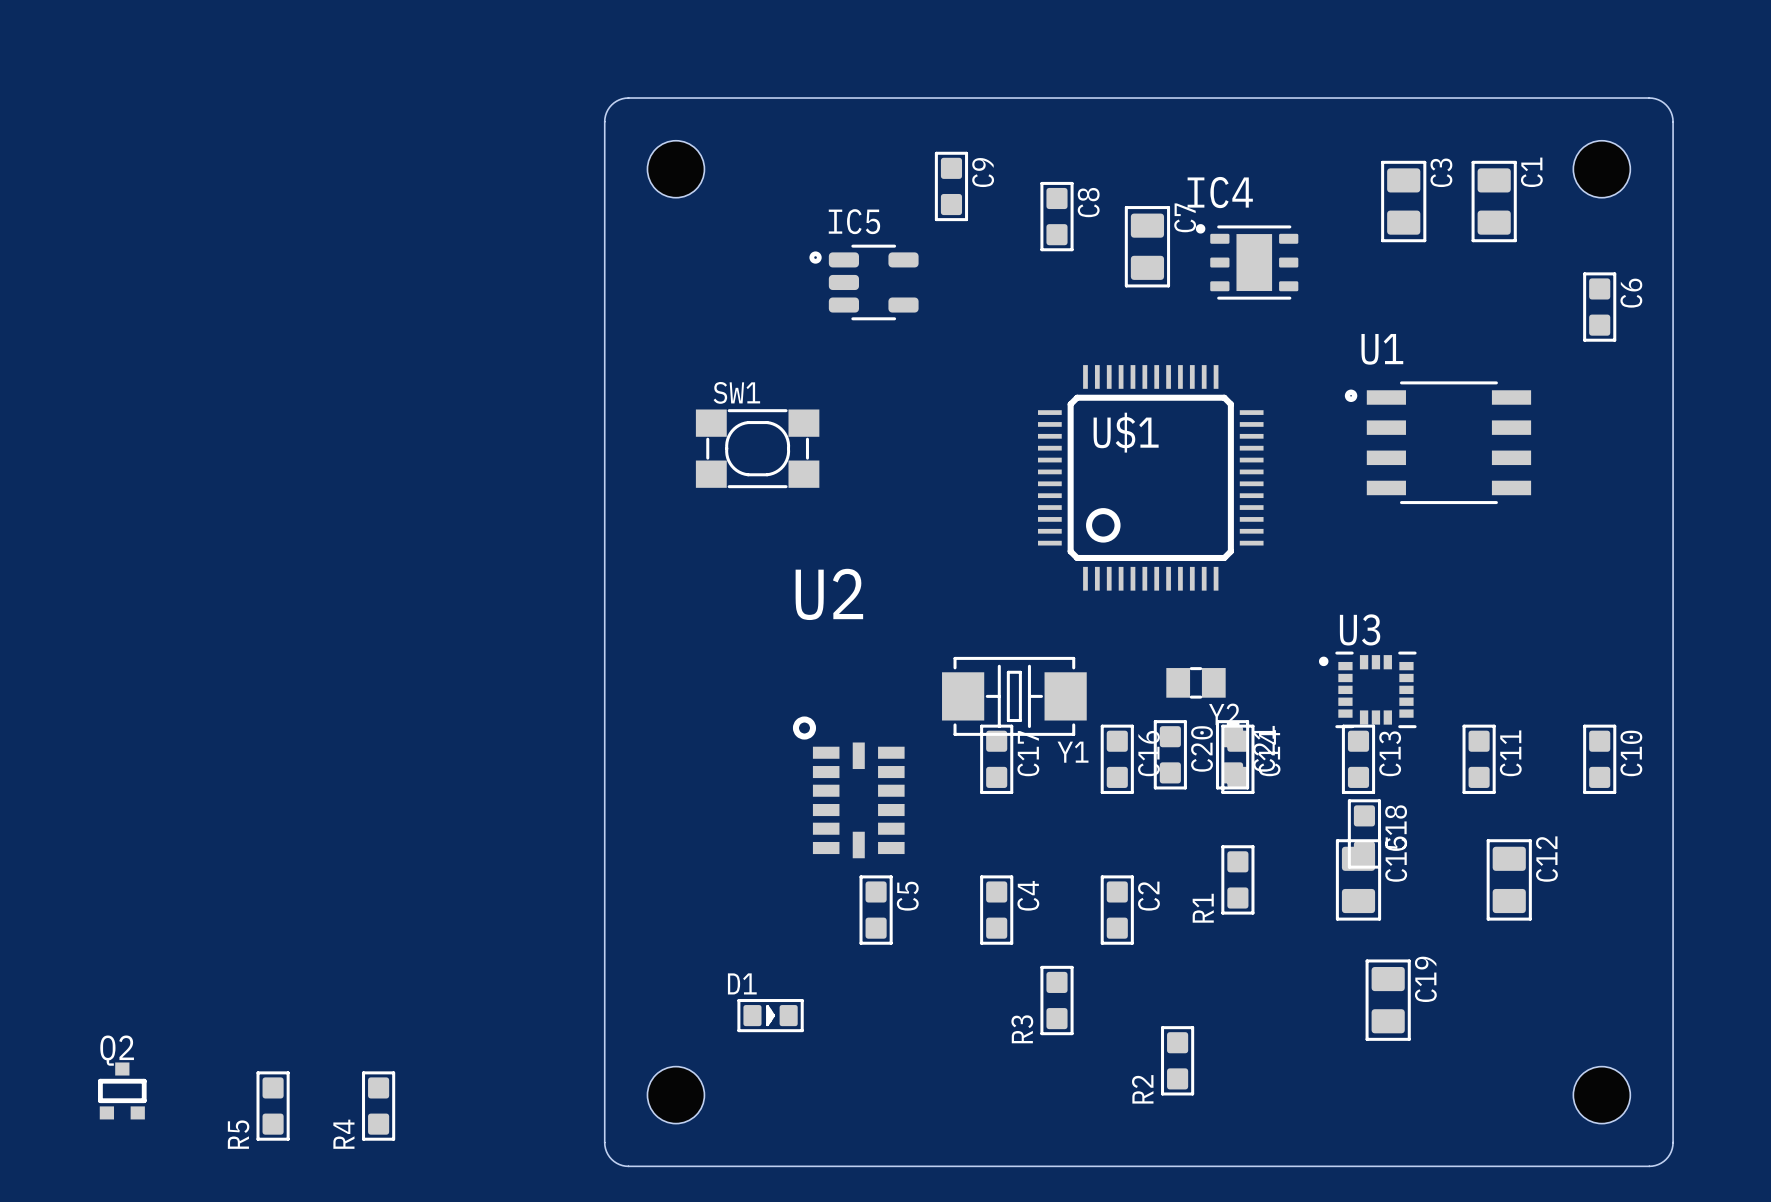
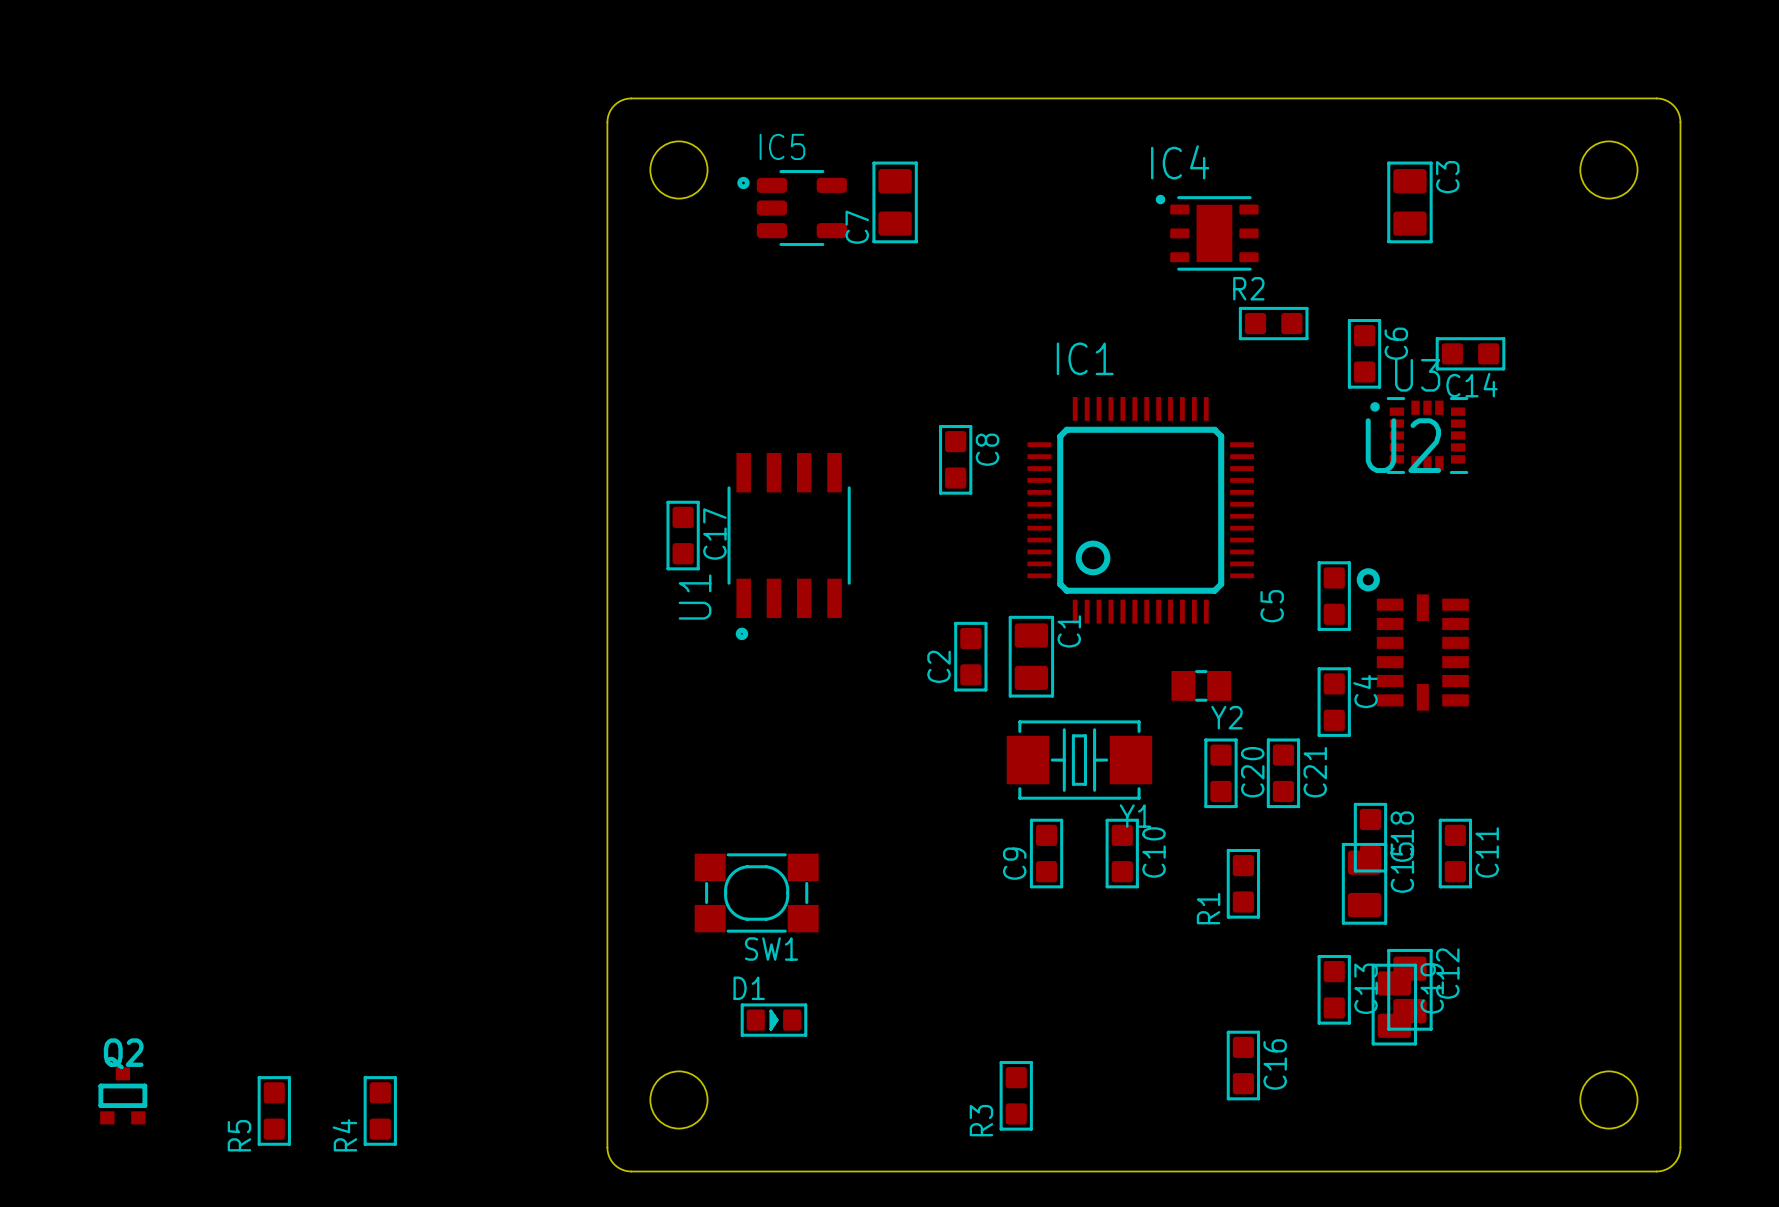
C9 name position: C9 (983, 172) -> C9 (1014, 863)
C9 position: (951, 186) -> (1046, 853)
C1 position: (1494, 201) -> (1031, 656)
C8 position: (1056, 216) -> (955, 459)
C7 name position: C7 (1185, 217) -> C7 (857, 227)
C7 position: (1147, 246) -> (895, 202)
IC4 position: (1247, 261) -> (1207, 232)
IC5 position: (864, 282) -> (792, 208)
C6 position: (1599, 307) -> (1364, 353)
SW1 name position: SW1 (736, 392) -> SW1 (771, 949)
U1 rotation: 0° (1437, 442) -> 90° counterclockwise (789, 546)
U1 position: (1437, 442) -> (789, 546)
SW1 position: (757, 448) -> (756, 892)
U$1: (1150, 477) -> none
IC1: none -> (1140, 510)
U3 position: (1367, 689) -> (1419, 435)
Y1 position: (1014, 696) -> (1079, 760)
C20 position: (1170, 754) -> (1220, 773)
C21 position: (1232, 754) -> (1283, 773)
C17 position: (996, 759) -> (683, 535)
C16 position: (1117, 759) -> (1243, 1065)
C14 rotation: 0° (1237, 759) -> 90° clockwise (1470, 353)
C14 position: (1237, 759) -> (1470, 353)
C13 position: (1358, 759) -> (1334, 989)
C11 position: (1479, 759) -> (1455, 853)
C10 position: (1599, 759) -> (1122, 853)
U2 position: (848, 787) -> (1412, 639)
C12 position: (1509, 879) -> (1409, 989)
C5 name position: C5 (907, 896) -> C5 (1272, 606)
C2 name position: C2 (1148, 896) -> C2 (939, 666)
C5 position: (876, 910) -> (1334, 596)
C4 position: (996, 910) -> (1334, 702)
C2 position: (1117, 910) -> (970, 656)
R3 position: (1056, 1000) -> (1016, 1095)
R2 rotation: 0° (1177, 1060) -> 90° clockwise (1273, 323)
R2 position: (1177, 1060) -> (1273, 323)

